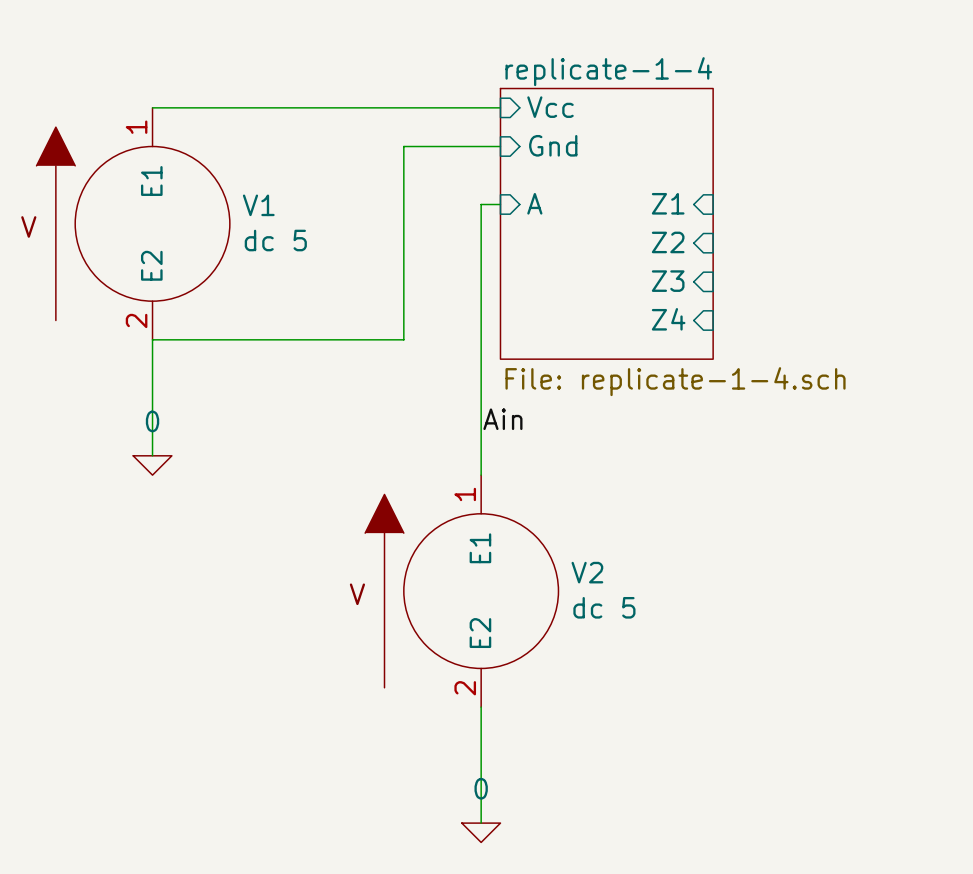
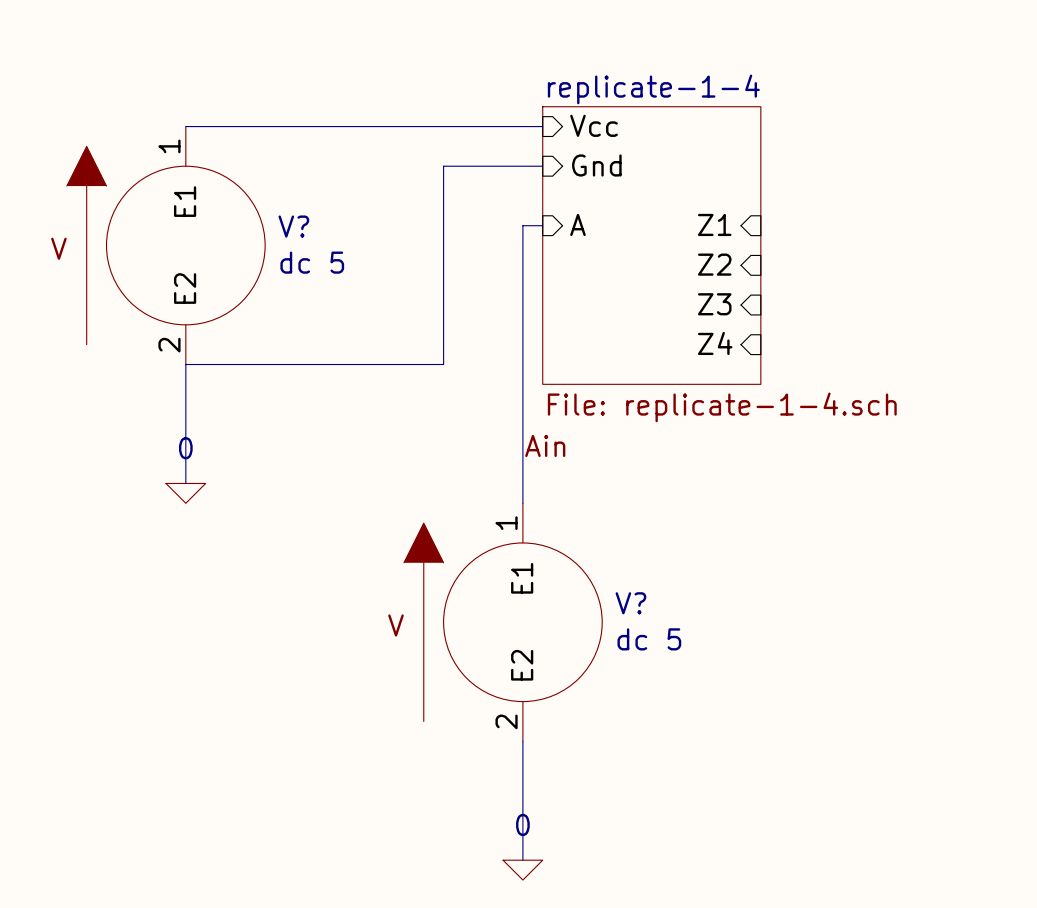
V1 name: V1 (258, 205) -> V? (293, 226)
V2 name: V2 (587, 572) -> V? (630, 603)

